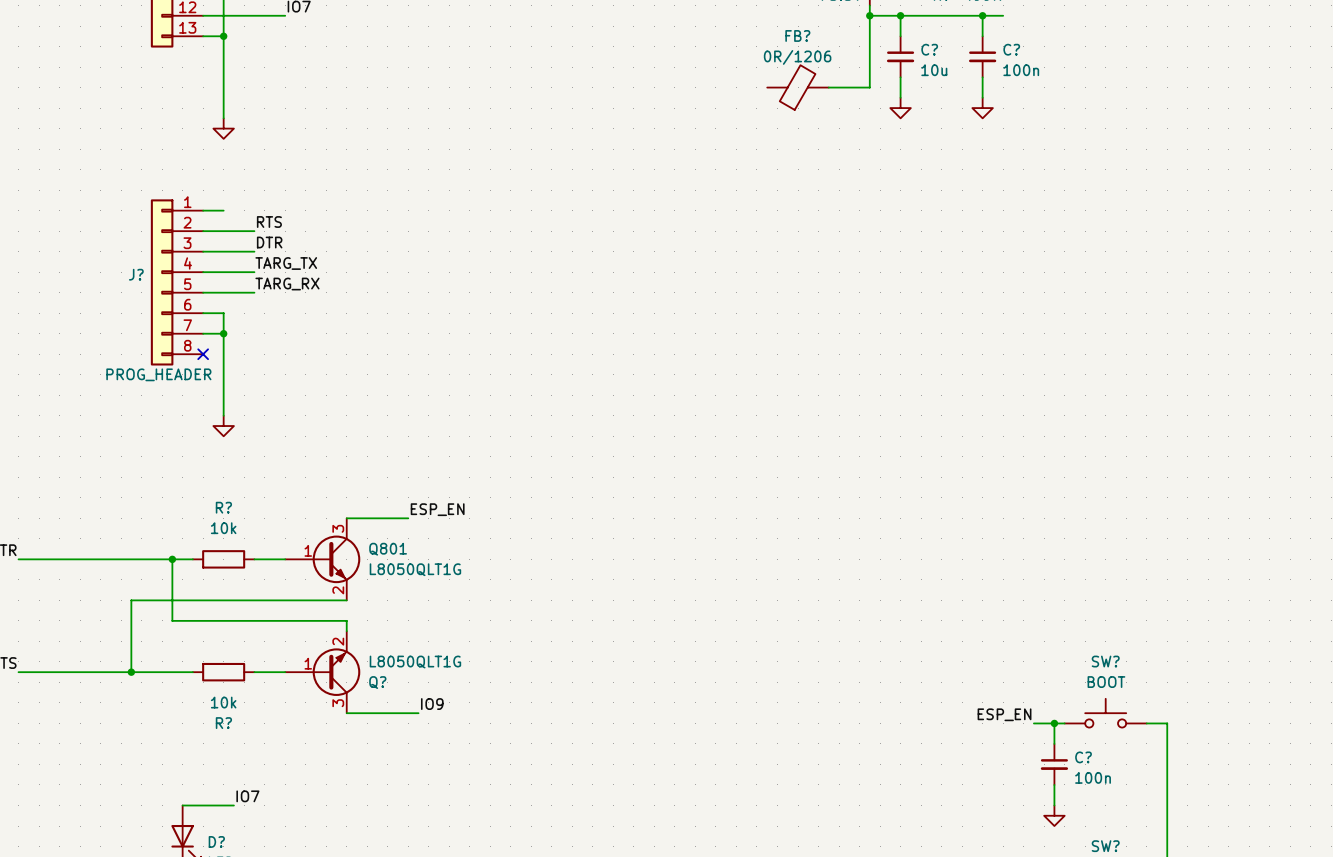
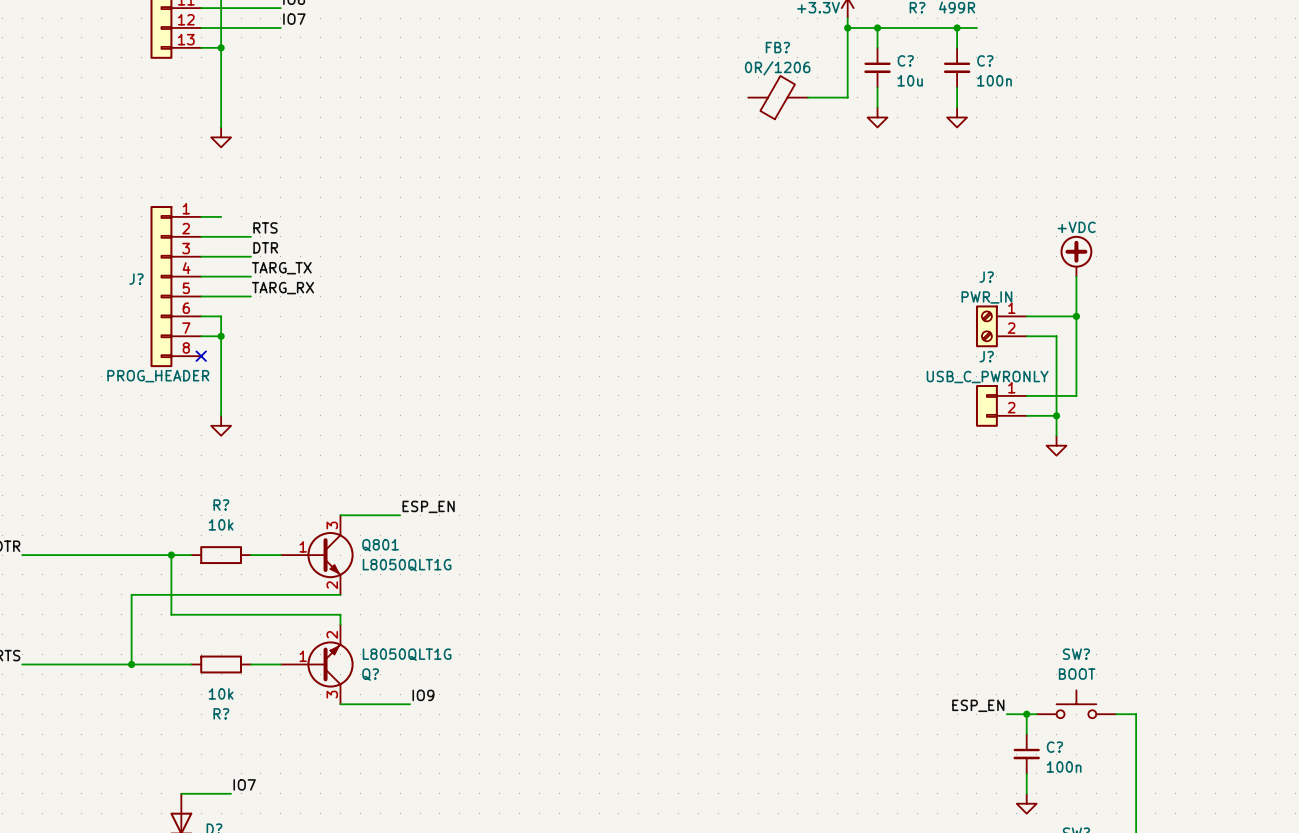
power symbol: none -> +VDC (1076, 256)
wire: none -> (1076, 276) (1076, 395) (1026, 395)
wire: none -> (1026, 316) (1076, 316)
junction: none -> (1076, 316)
J?: none -> PWR_IN (1001, 326)
wire: none -> (1026, 336) (1056, 336) (1056, 435)
J?: none -> USB_C_PWRONLY (1001, 405)
wire: none -> (1026, 415) (1056, 415)
junction: none -> (1056, 415)
power symbol: none -> (1056, 445)

